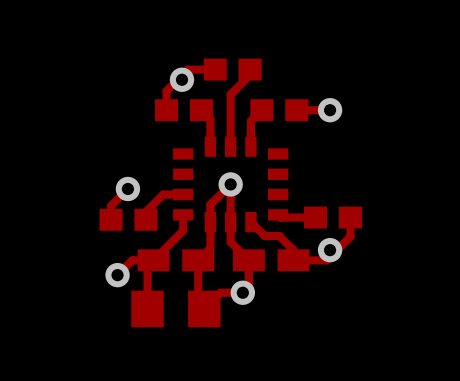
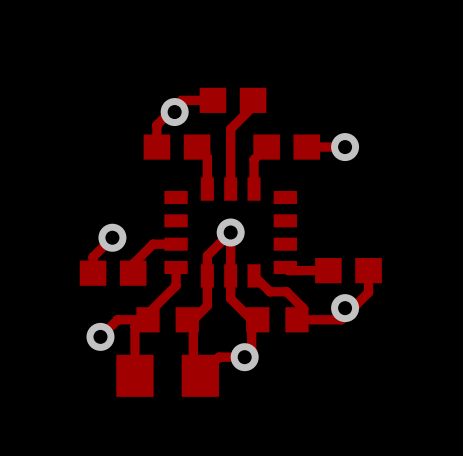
part footprint: [137, 249, 215, 272] -> [136, 307, 199, 333]
part footprint: [232, 249, 310, 272] -> [246, 307, 309, 333]

